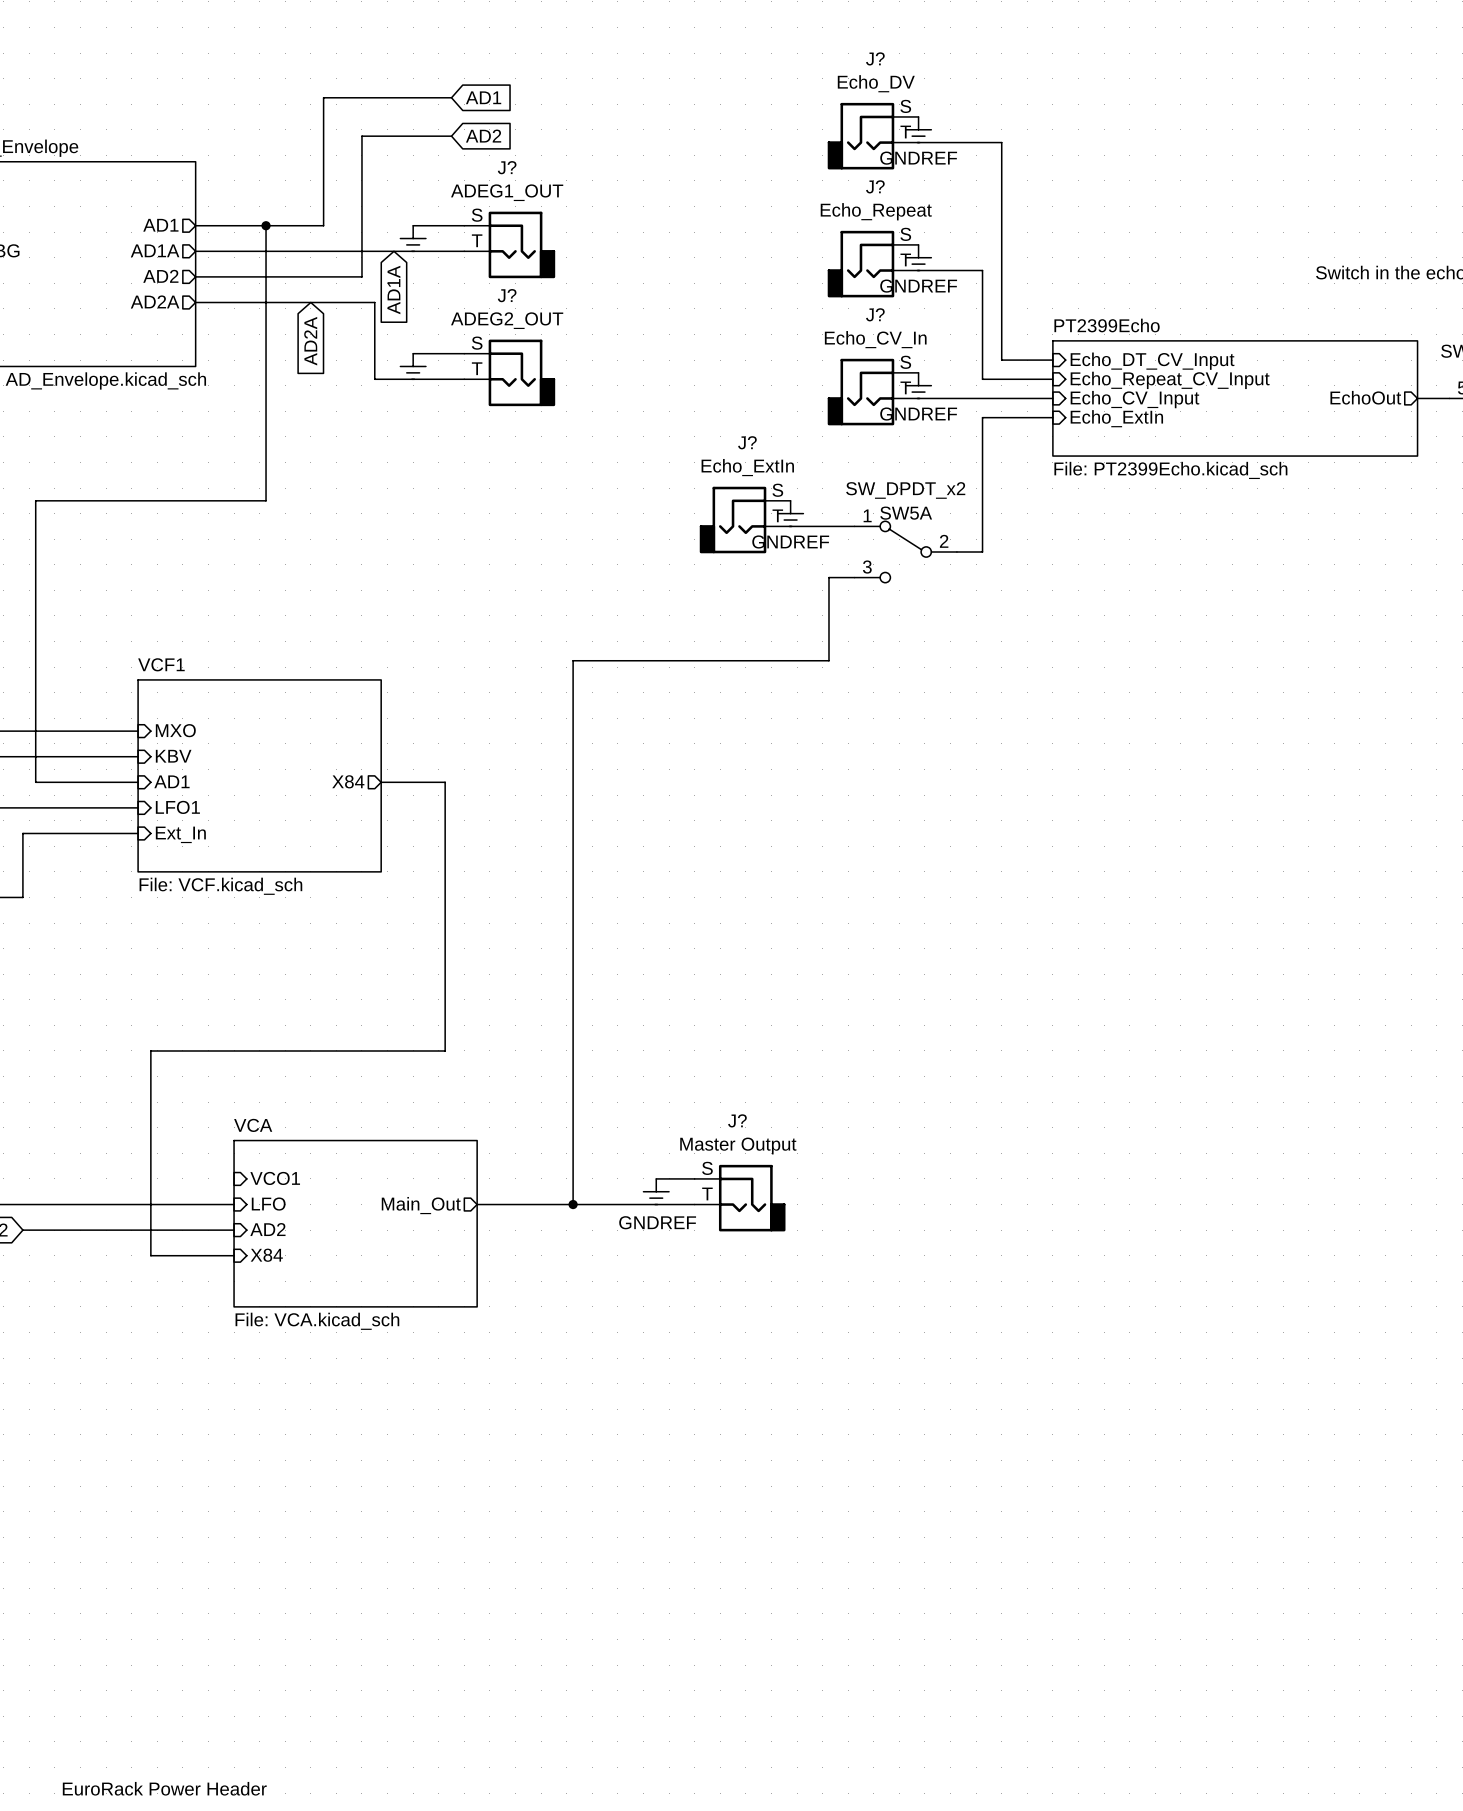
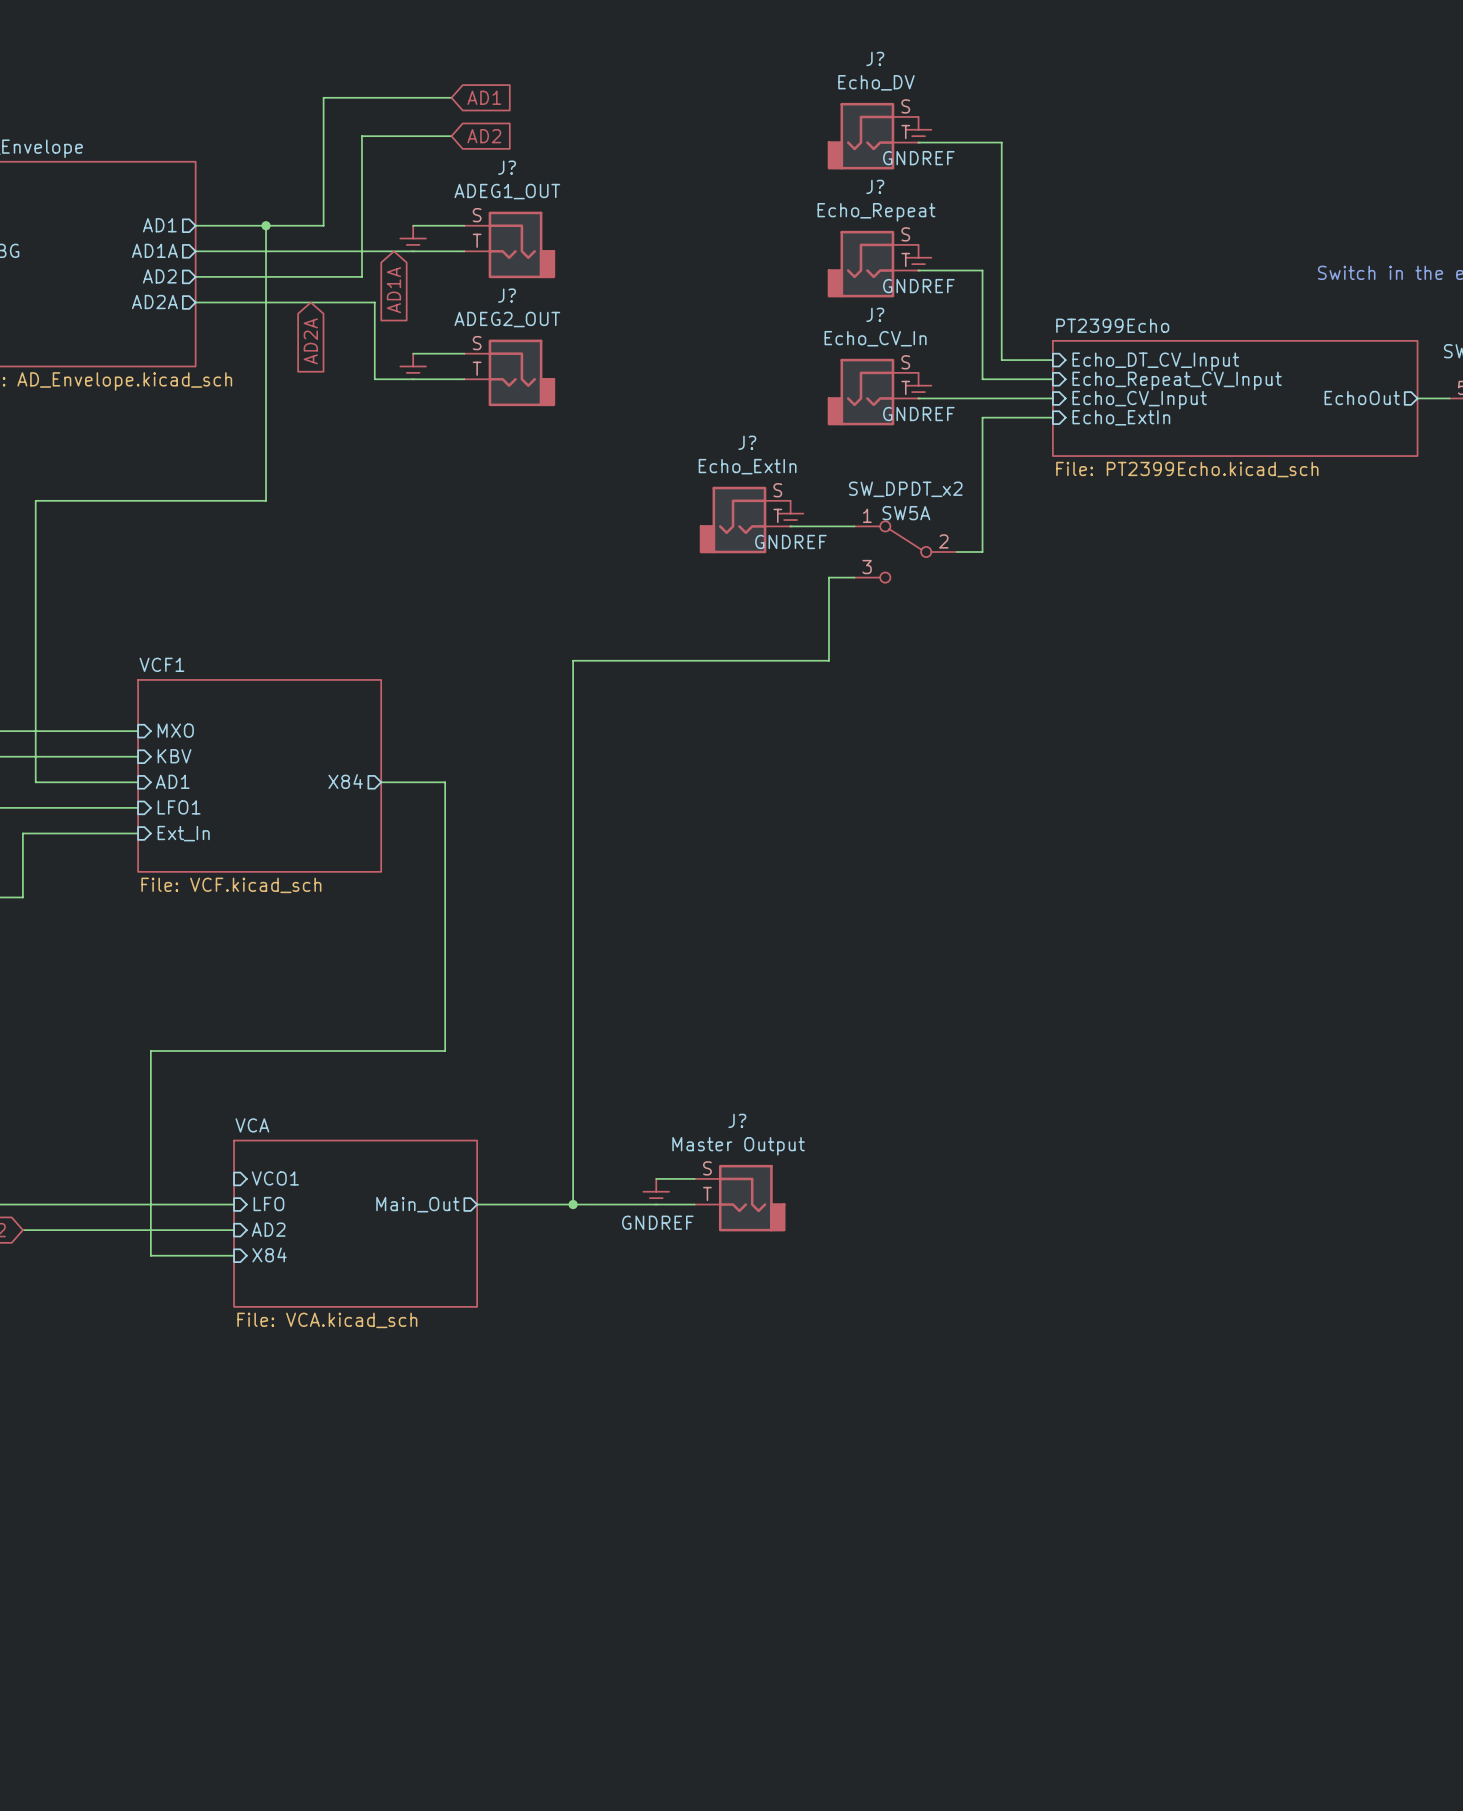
text: EuroRack Power Header (164, 1788) -> none

